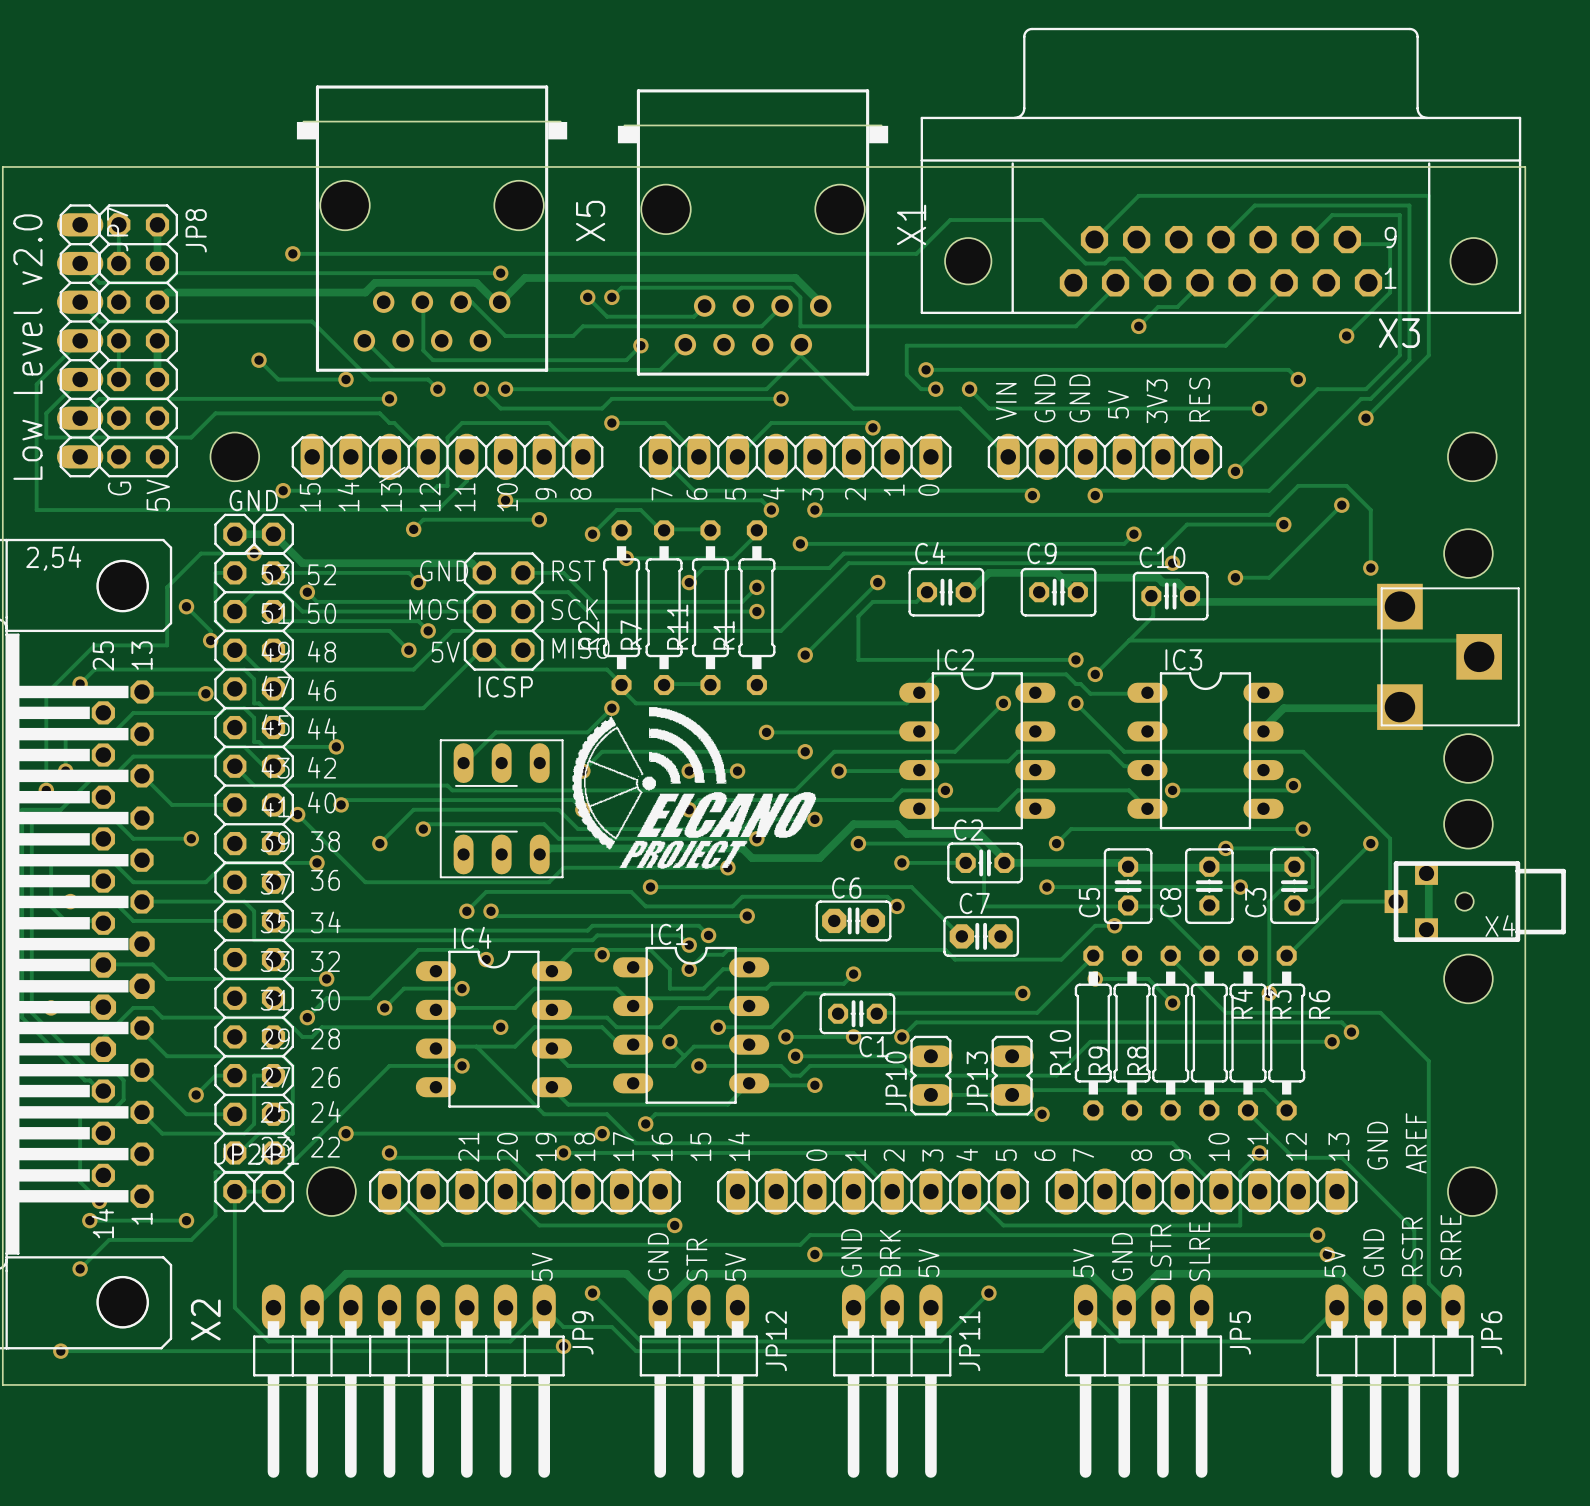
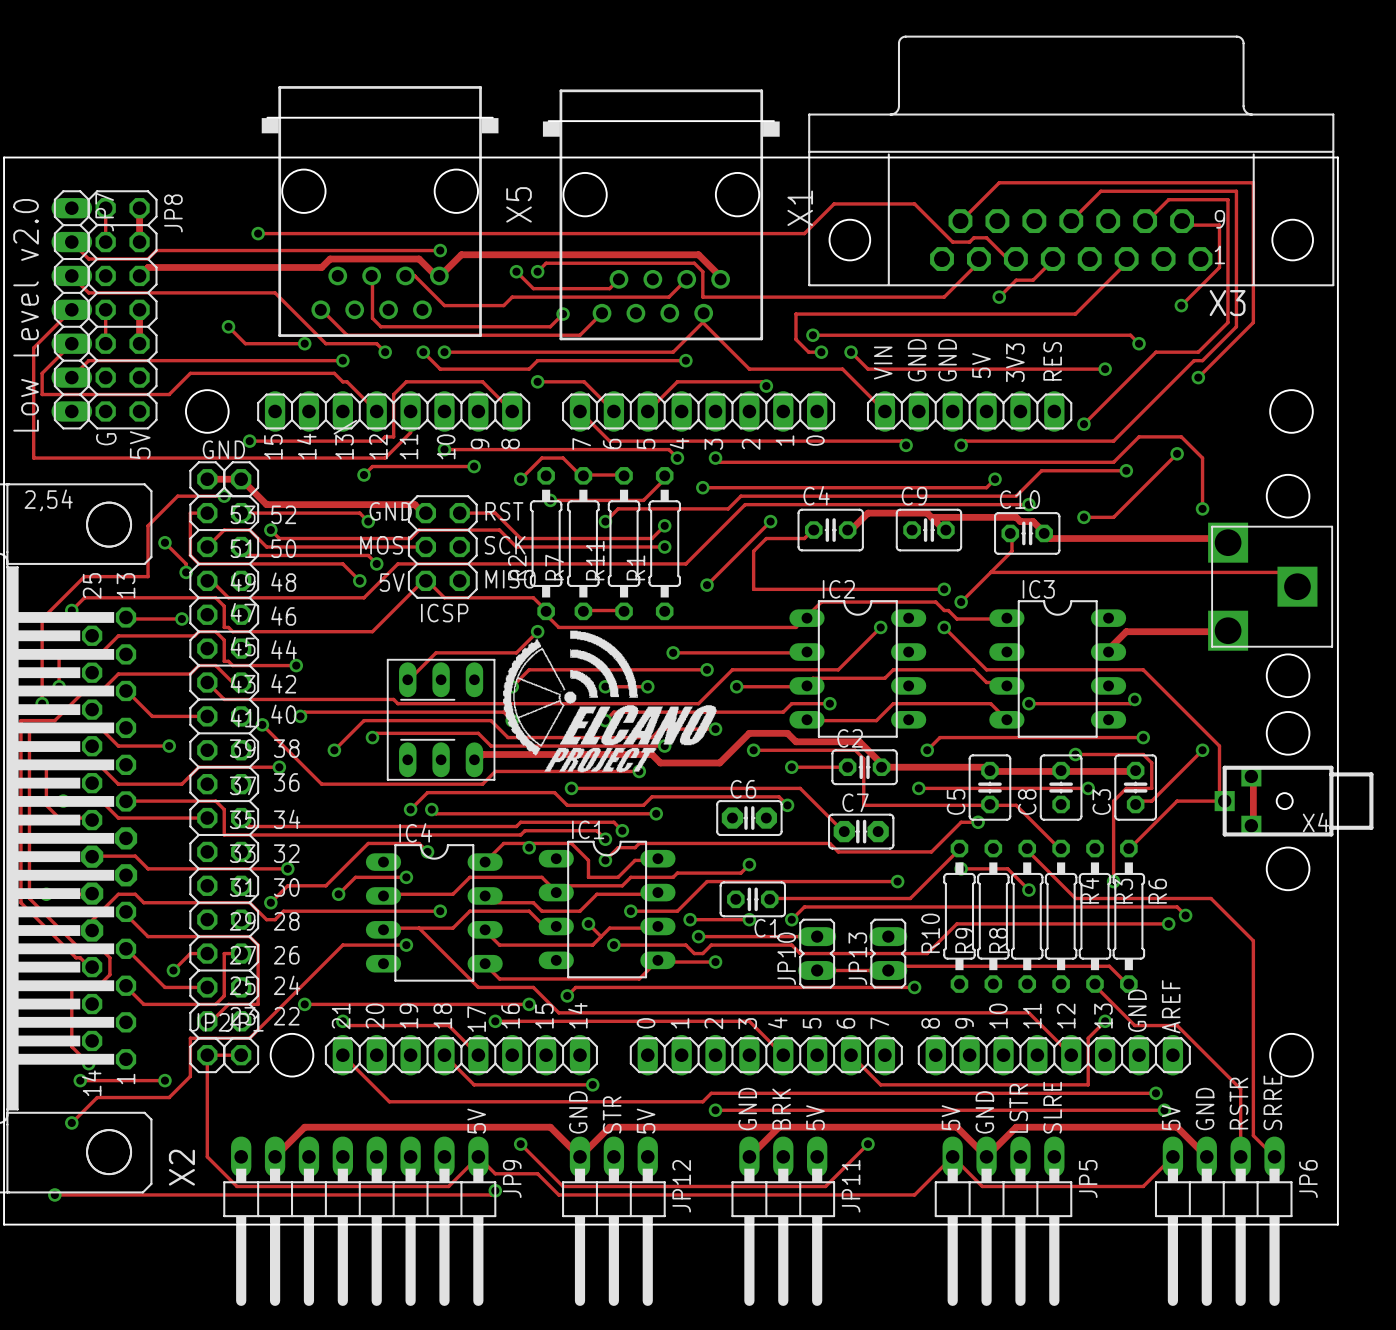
text position: AREF (1416, 1143) -> AREF (1171, 1006)
text position: GND (1377, 1145) -> GND (1137, 1010)
text position: 19 (546, 1146) -> 19 (408, 1016)
text position: 18 (584, 1146) -> 18 (442, 1016)
text position: 17 (623, 1146) -> 17 (476, 1019)
text position: 16 (662, 1146) -> 16 (510, 1016)
text position: 15 (700, 1146) -> 15 (544, 1016)
text position: 14 (739, 1146) -> 14 (577, 1015)
text: none -> 11 (1032, 1016)
text position: 10 (1219, 1146) -> 10 (998, 1016)
text: 11 (1257, 1146) -> 13 (1103, 1016)
text position: 12 (1296, 1146) -> 12 (1066, 1016)
text: 13 (1338, 1146) -> none
text position: 21 (468, 1147) -> 21 (341, 1016)
text position: 20 (507, 1147) -> 20 (375, 1016)
text position: 4 (967, 1154) -> 4 (777, 1022)
text position: 0 (816, 1155) -> 0 (646, 1023)
text position: 1 (855, 1155) -> 1 (679, 1023)
text position: 2 (894, 1155) -> 2 (713, 1023)
text position: 3 (932, 1155) -> 3 (747, 1023)
text position: 5 (1006, 1155) -> 5 (812, 1023)
text position: 6 (1044, 1155) -> 6 (845, 1023)
text position: 7 (1083, 1155) -> 7 (879, 1023)
text position: 8 (1141, 1155) -> 8 (930, 1023)
text position: 9 (1180, 1155) -> 9 (964, 1023)

